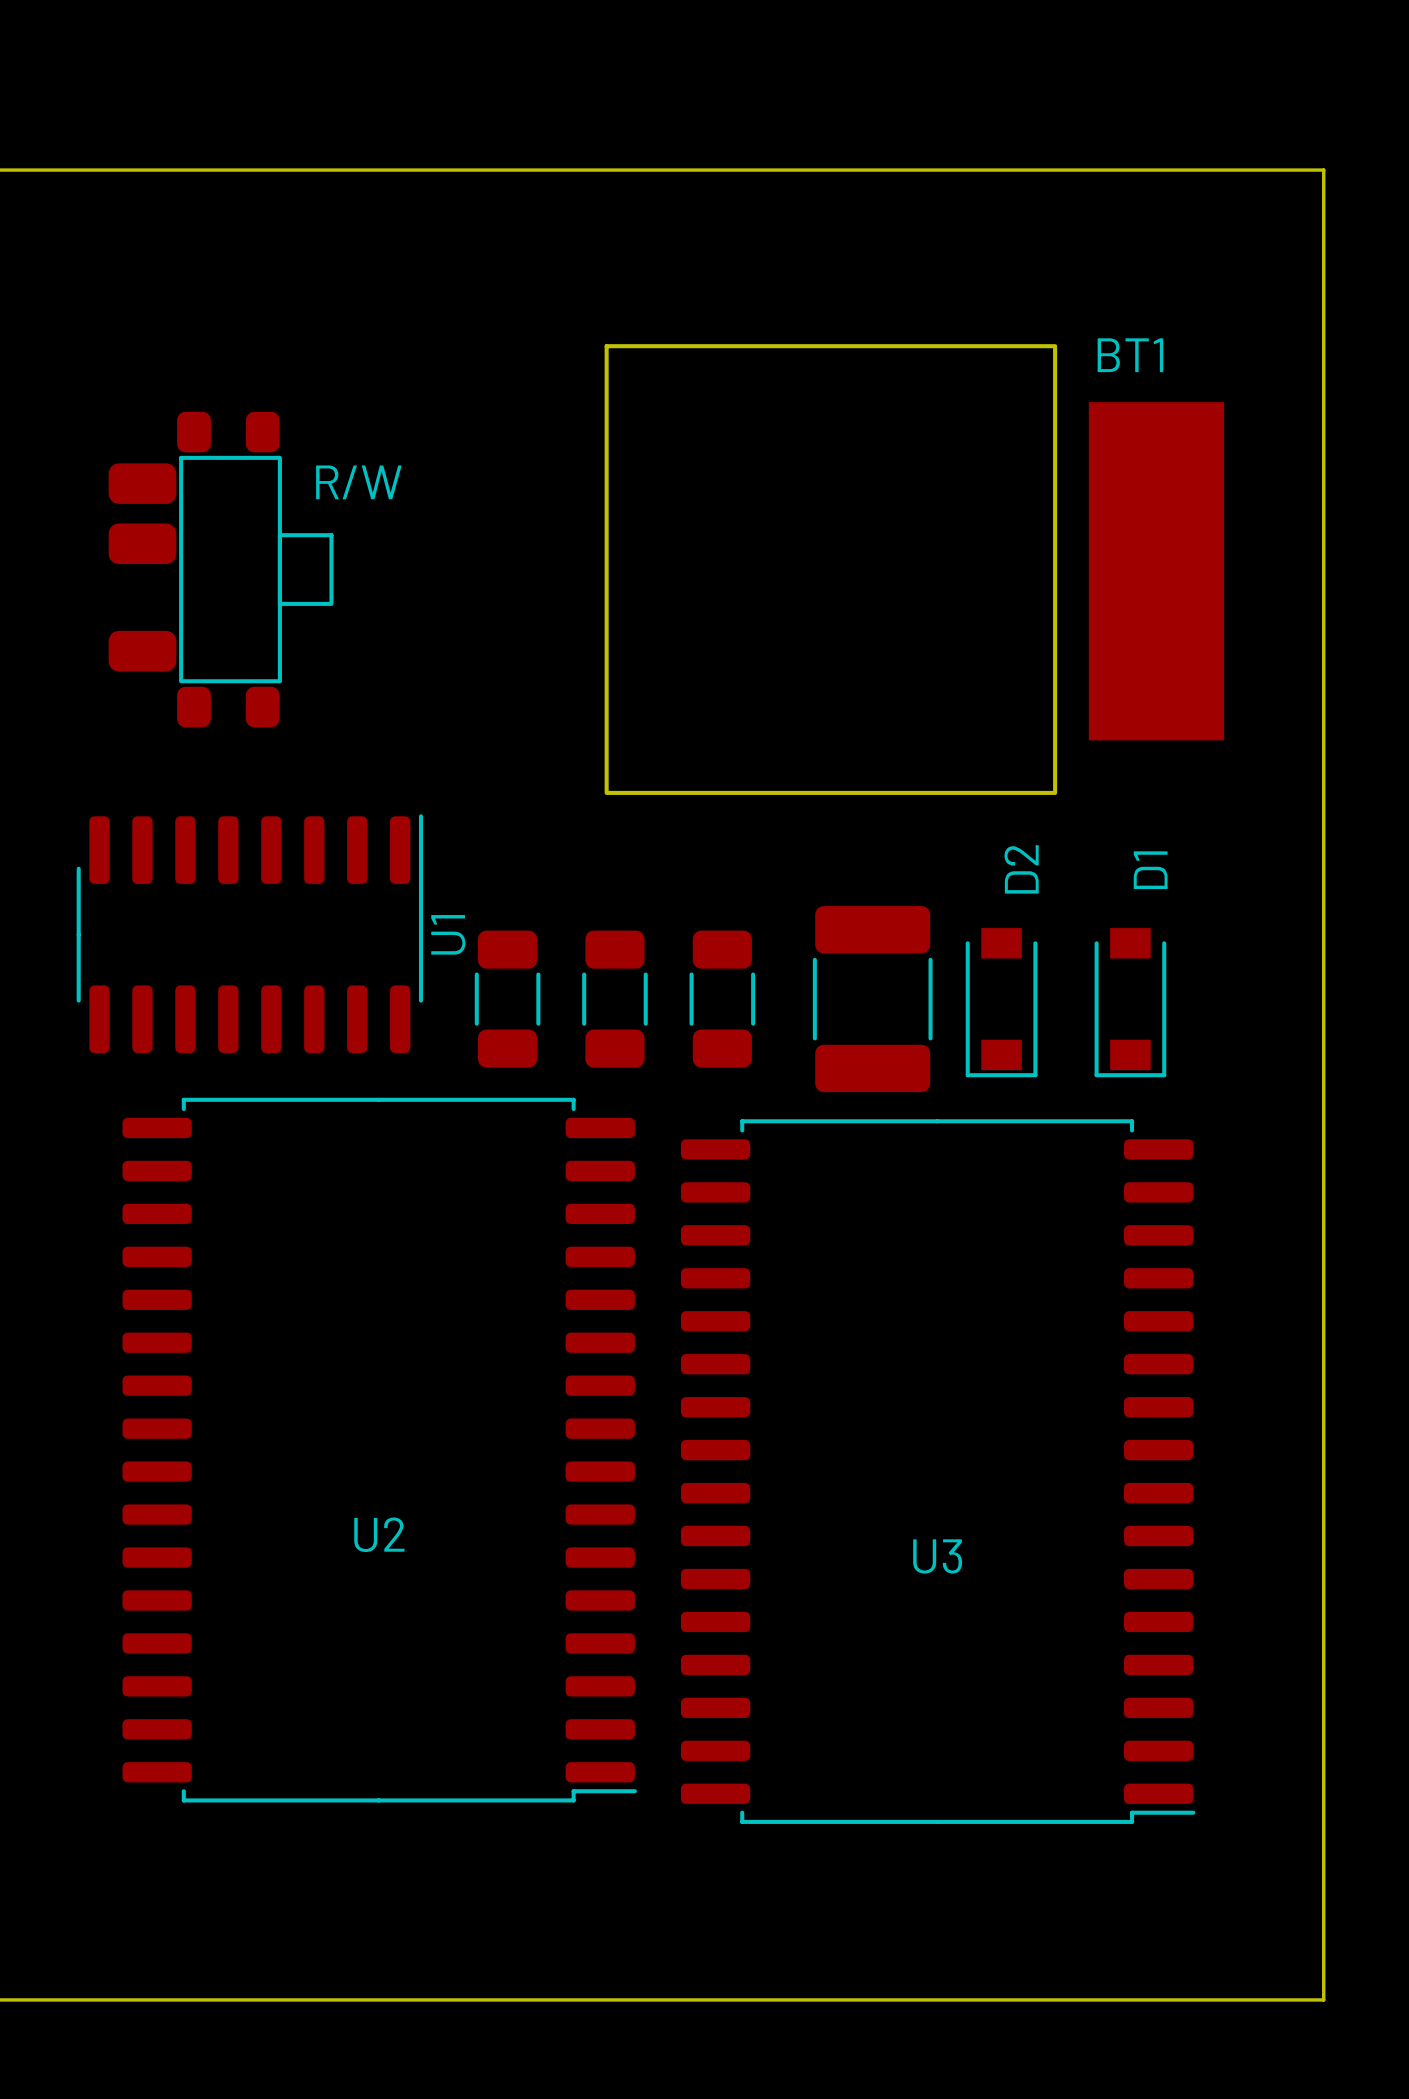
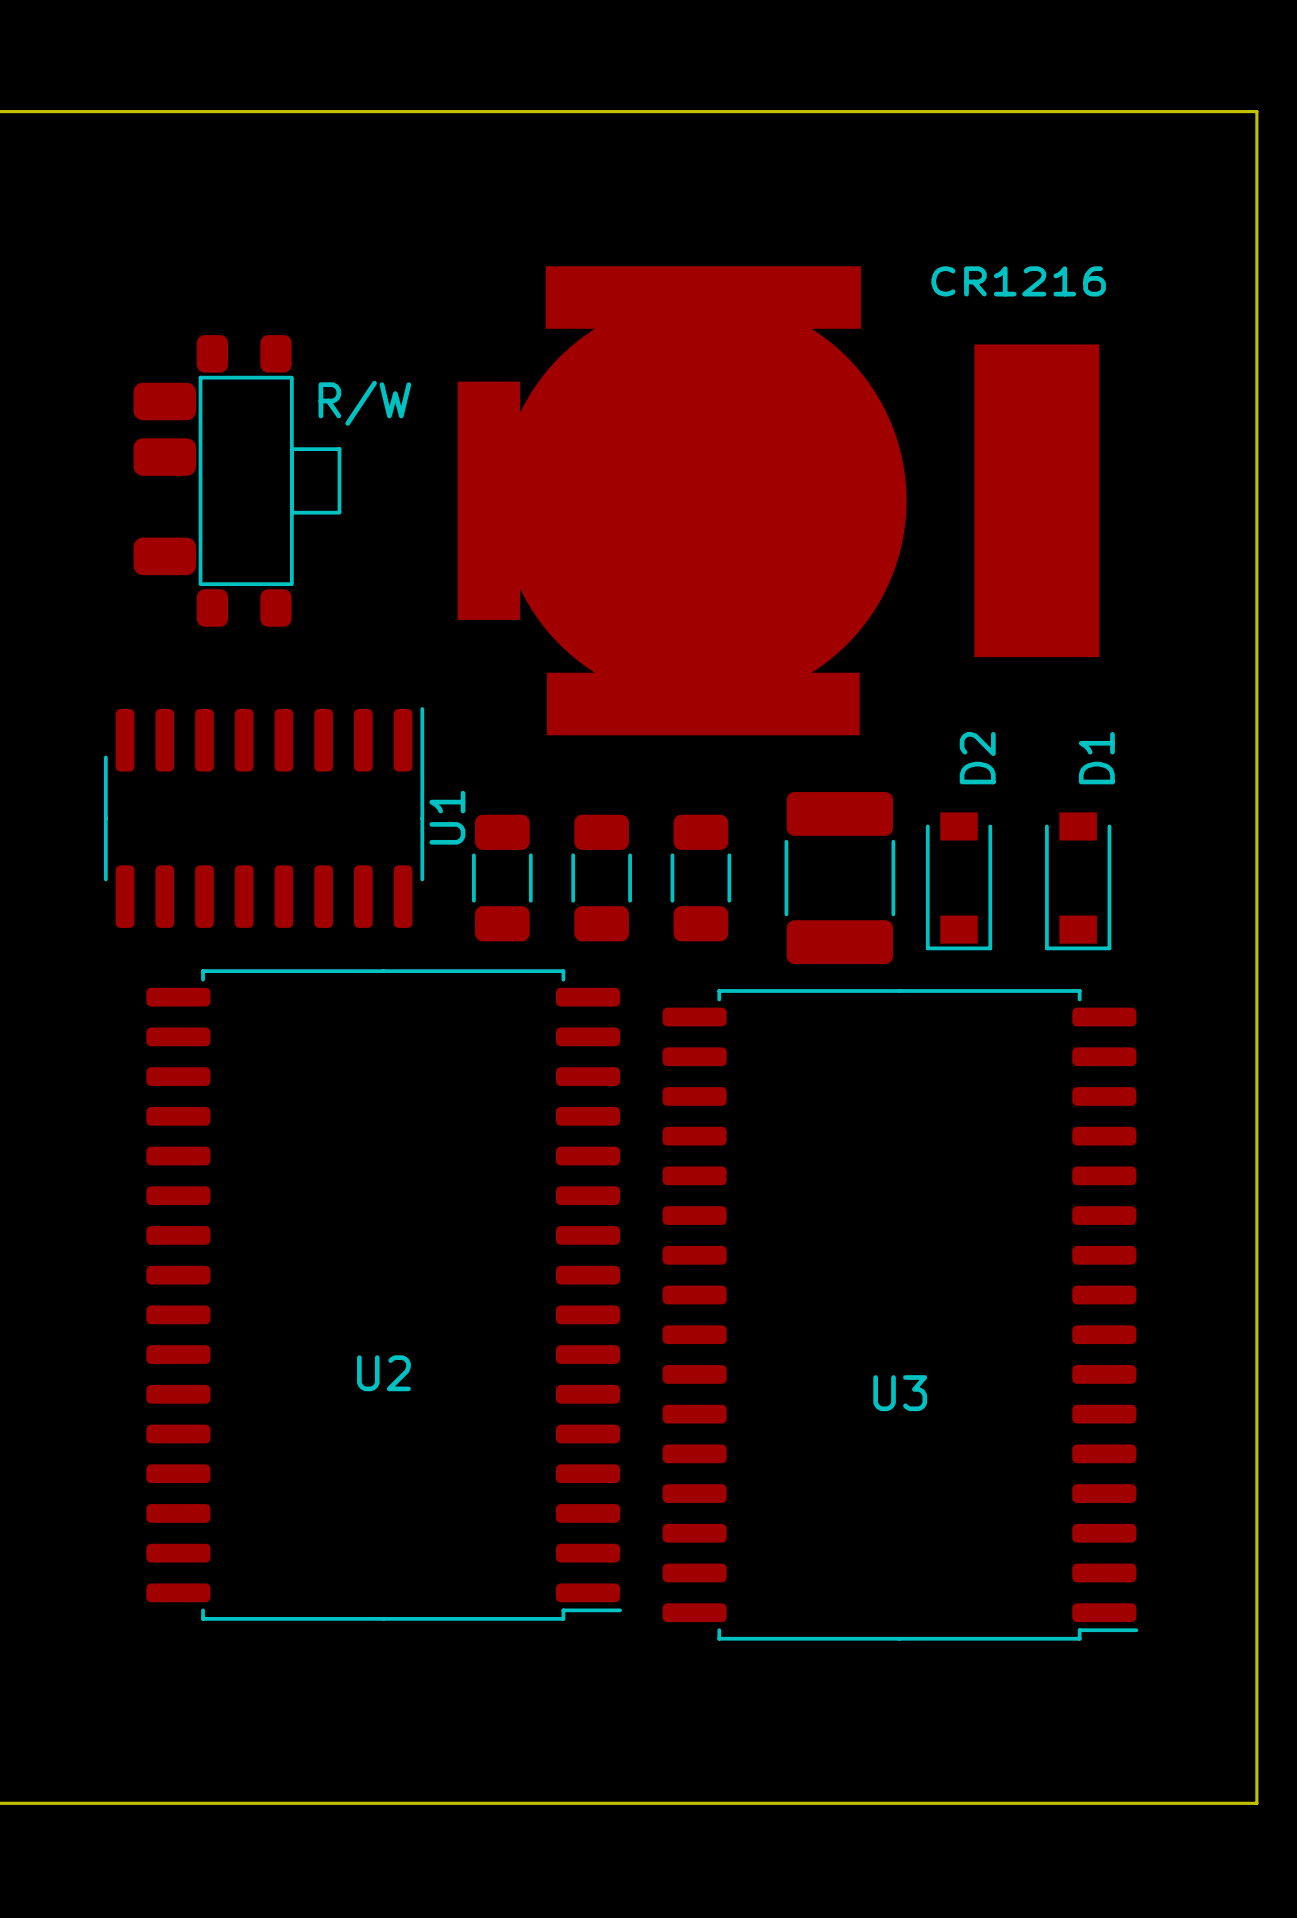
text: none -> CR1216 (1018, 281)
BT1: (914, 569) -> none
part: none -> (778, 500)

